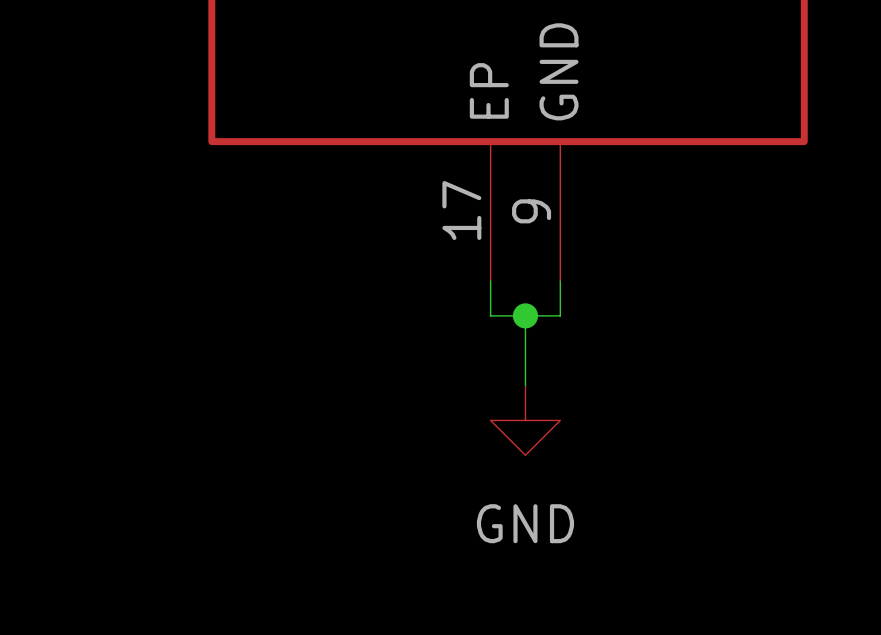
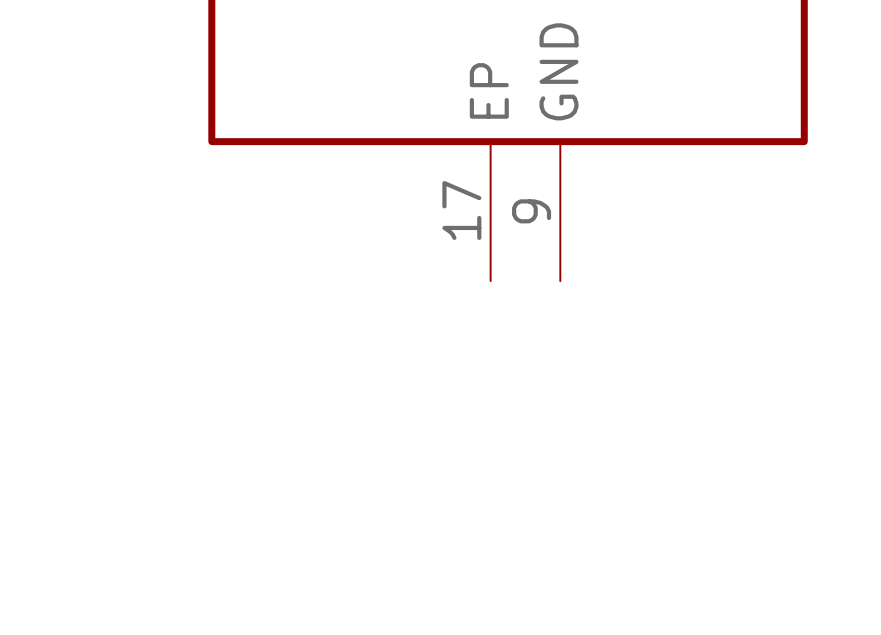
wire: (490, 281) (490, 315) (560, 315) (560, 281) -> none
wire: (525, 315) (525, 385) -> none
junction: (525, 315) -> none
power symbol: GND (525, 420) -> none

